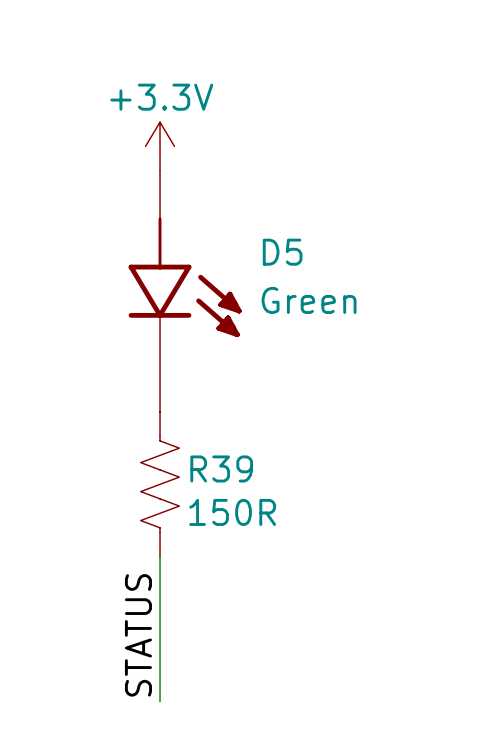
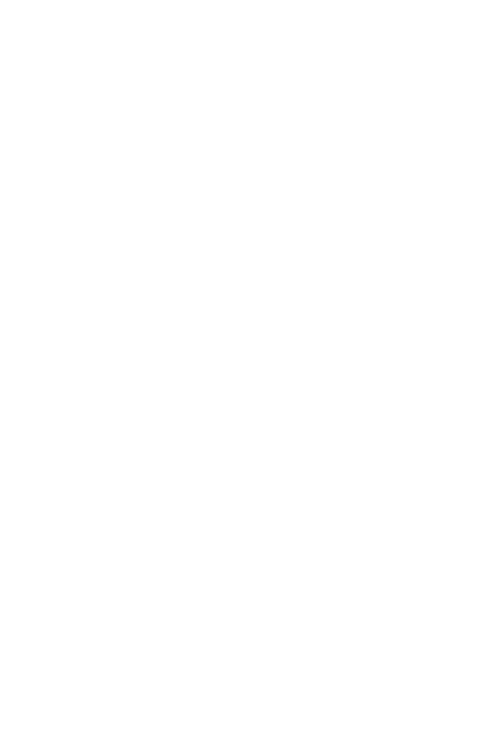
power symbol: +3.3V (160, 146) -> none
D5: Green (185, 291) -> none
R39: 150R (160, 484) -> none
wire: (160, 556) (160, 701) -> none
label: STATUS (138, 635) -> none

